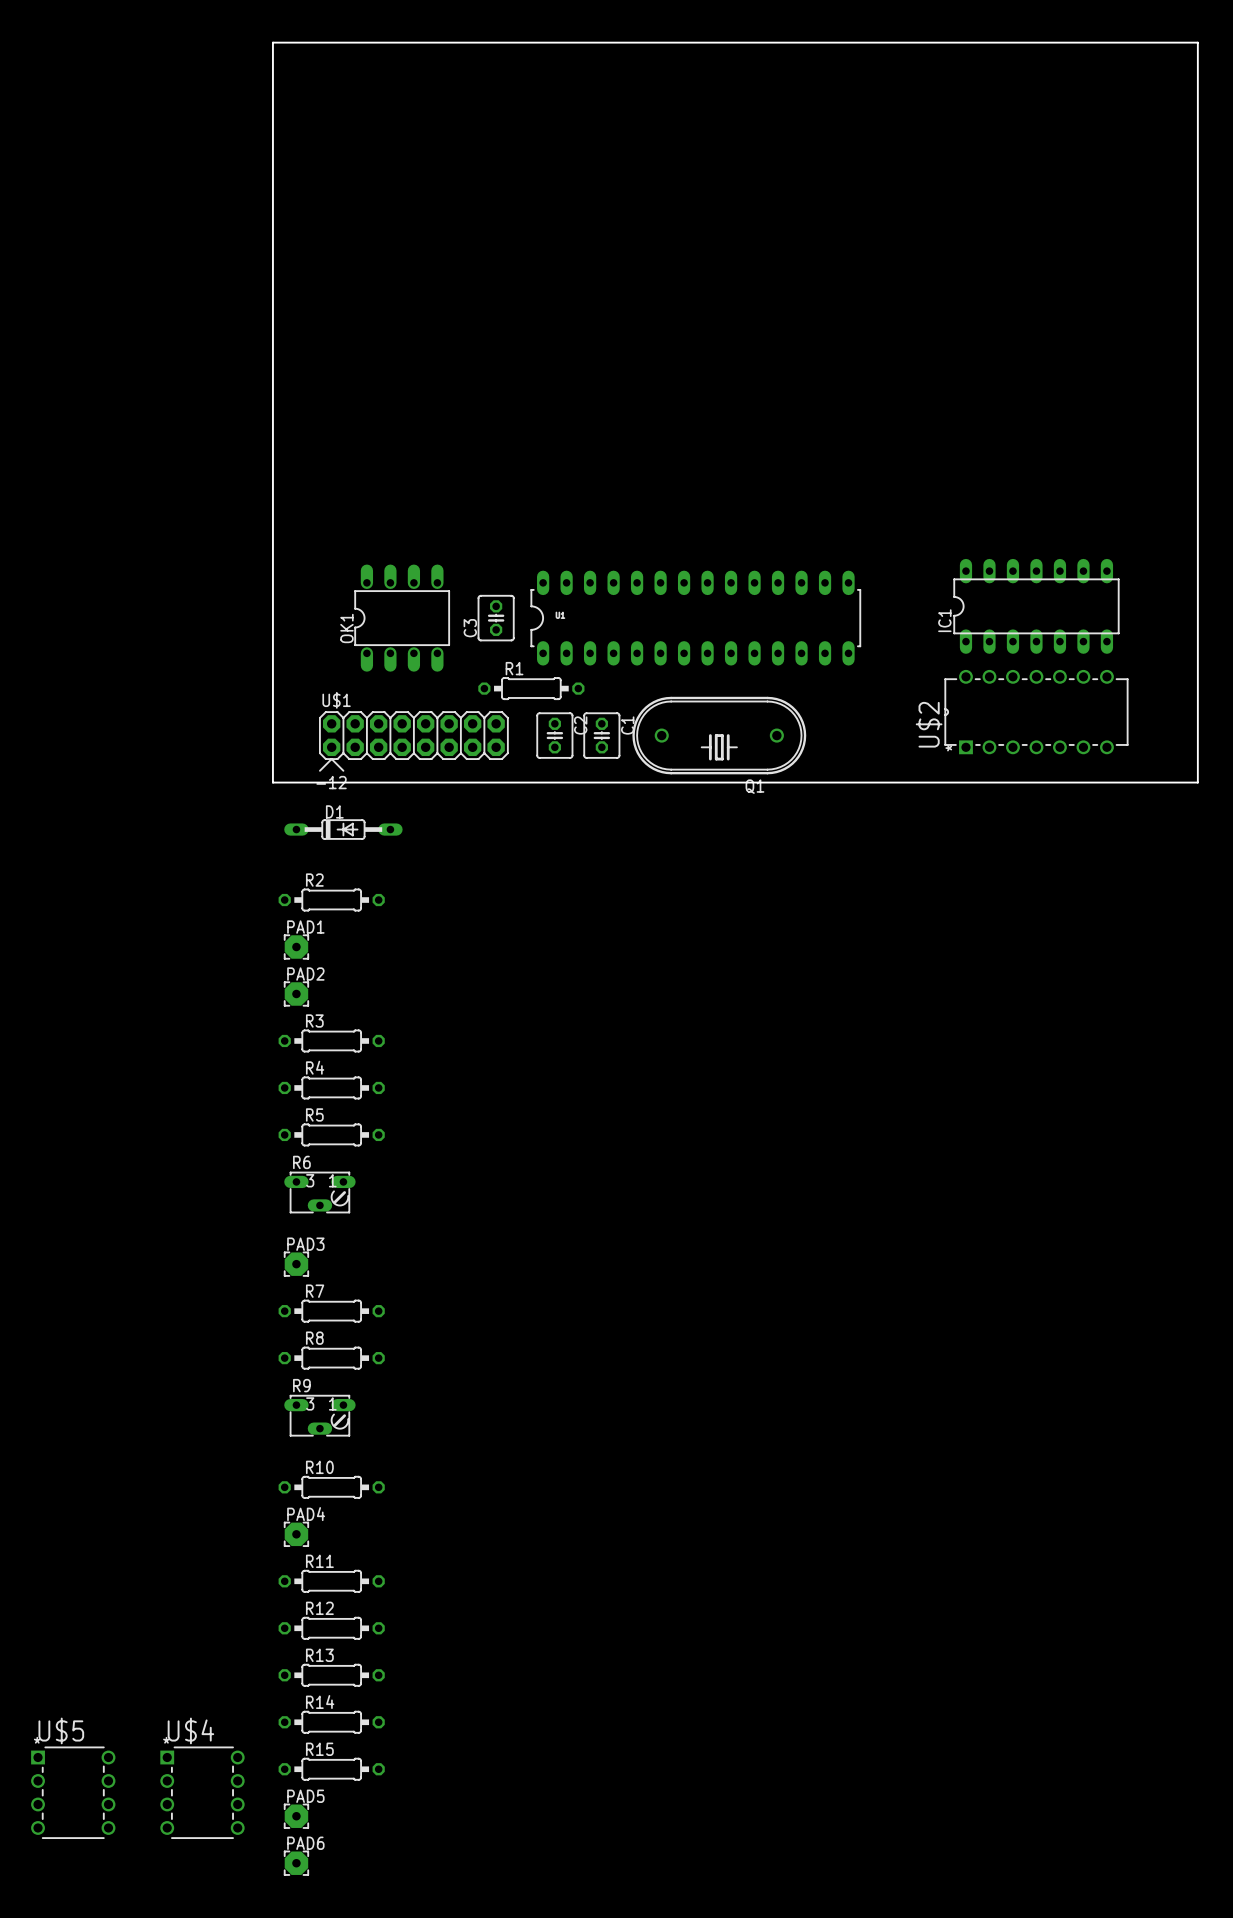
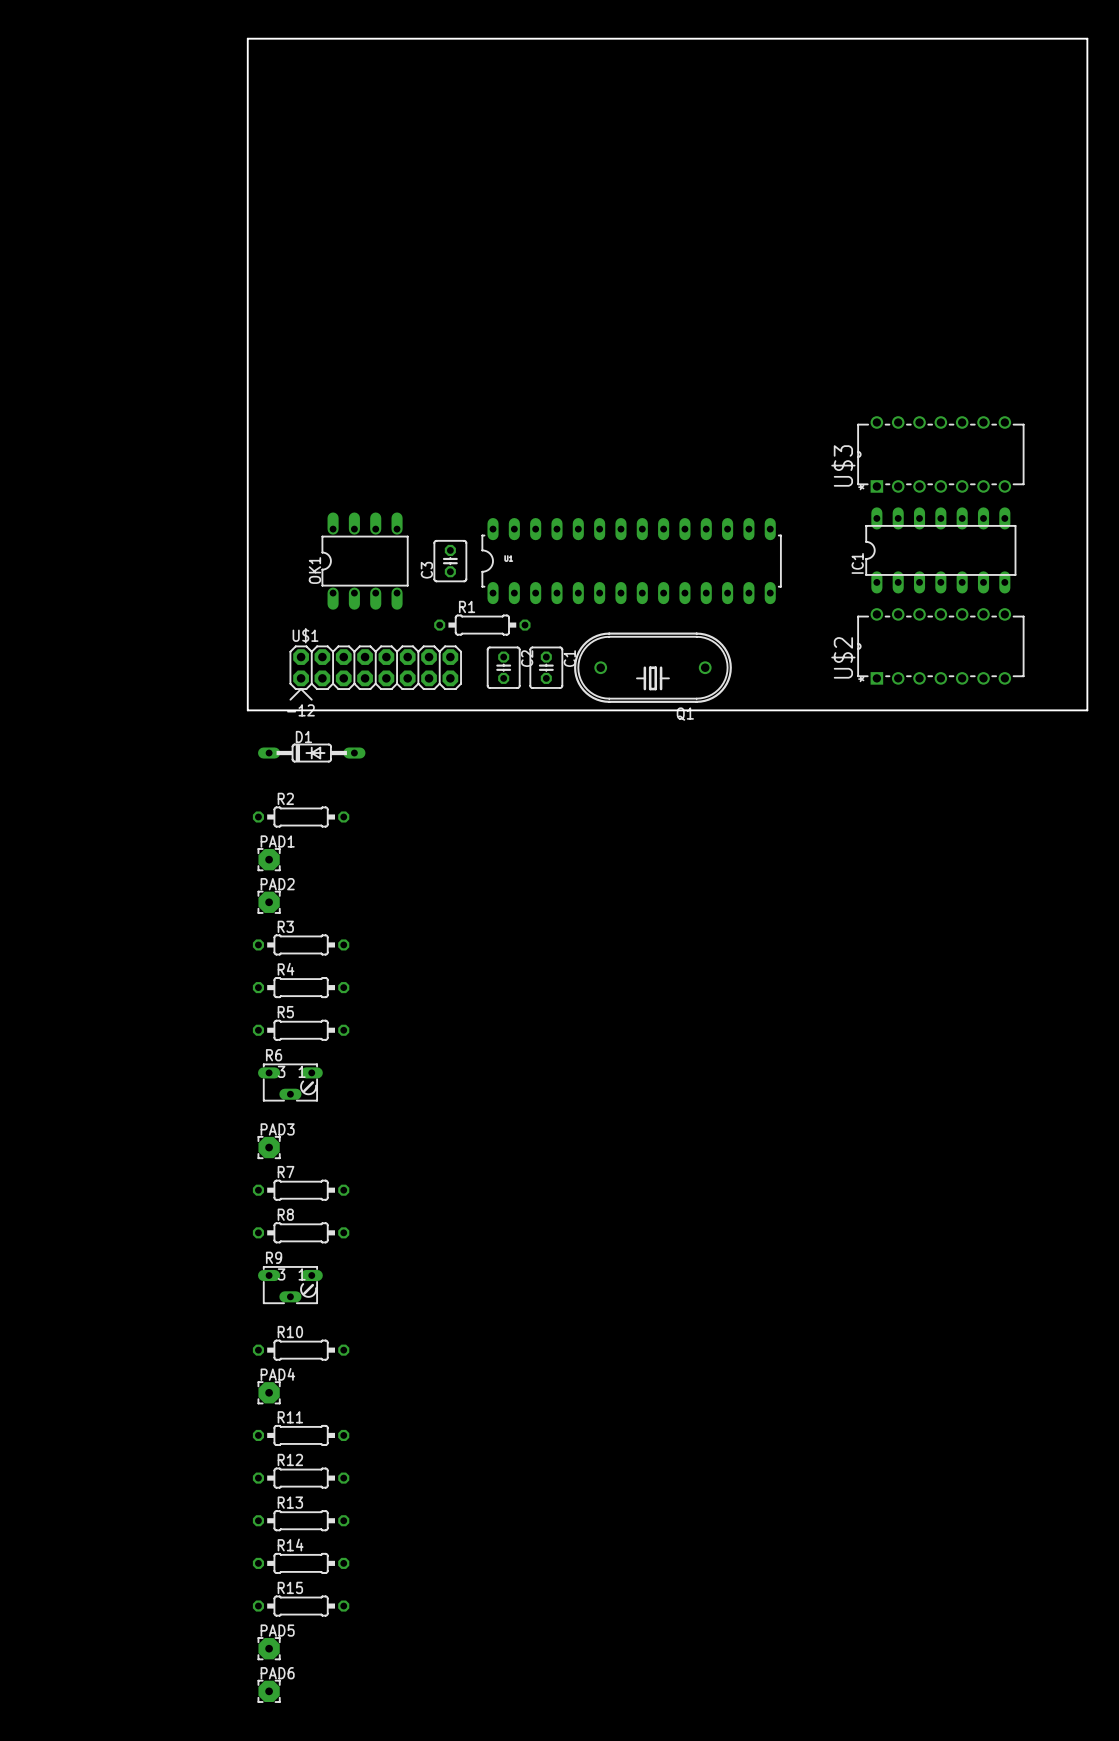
U$3: none -> (940, 454)
U$5: (73, 1792) -> none
U$4: (202, 1792) -> none

